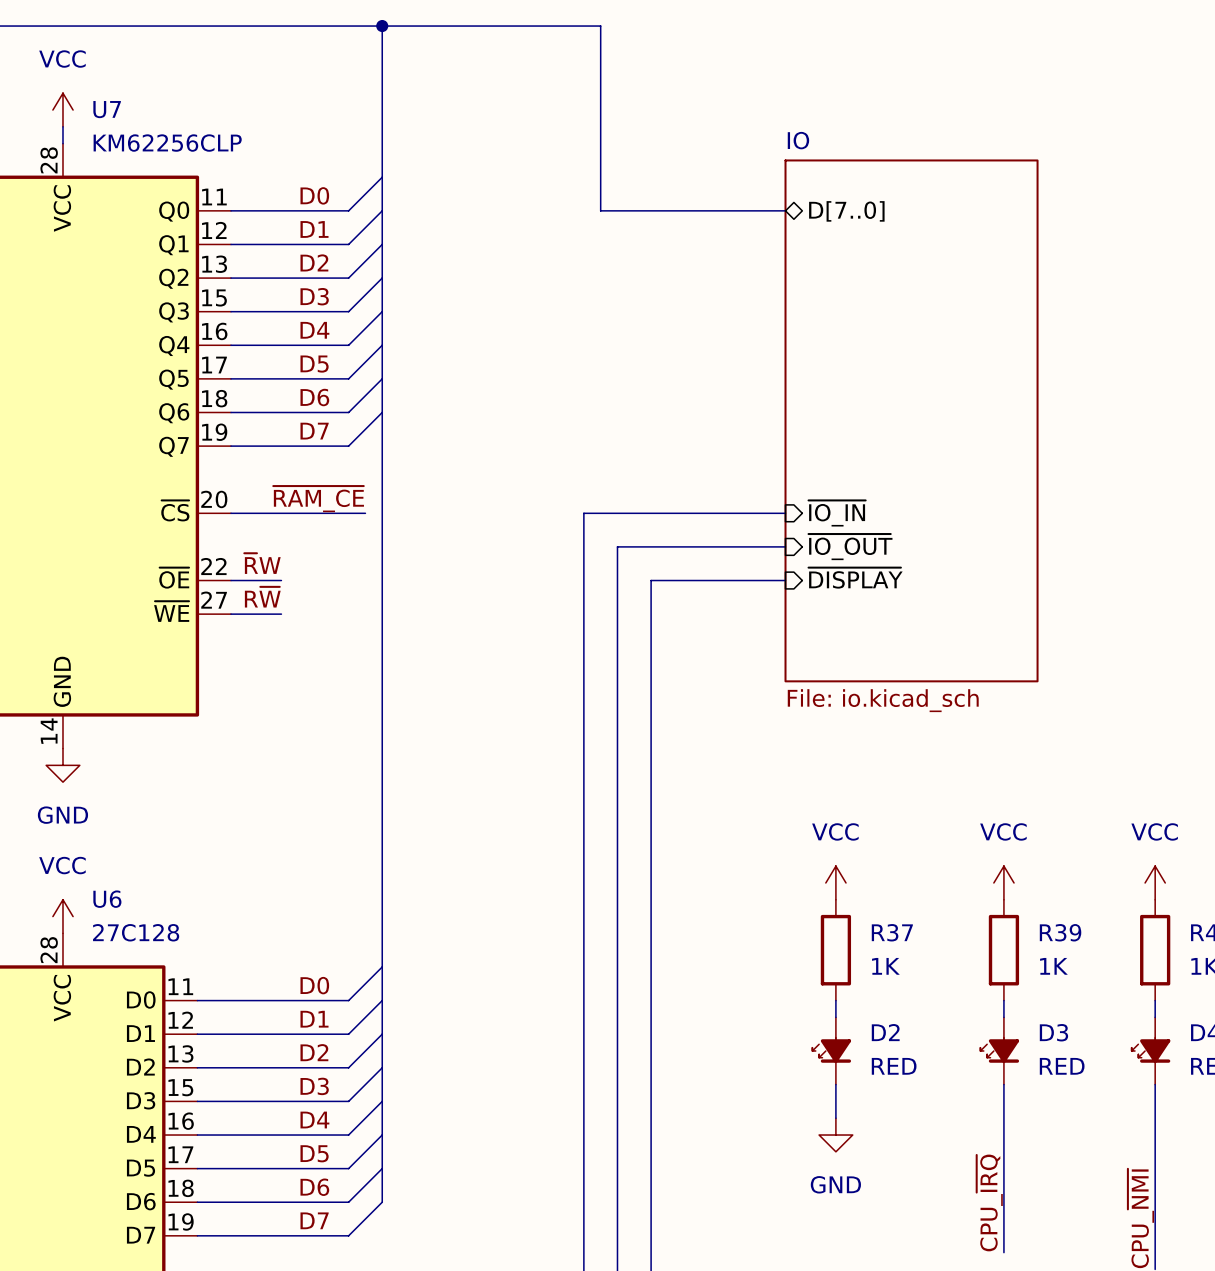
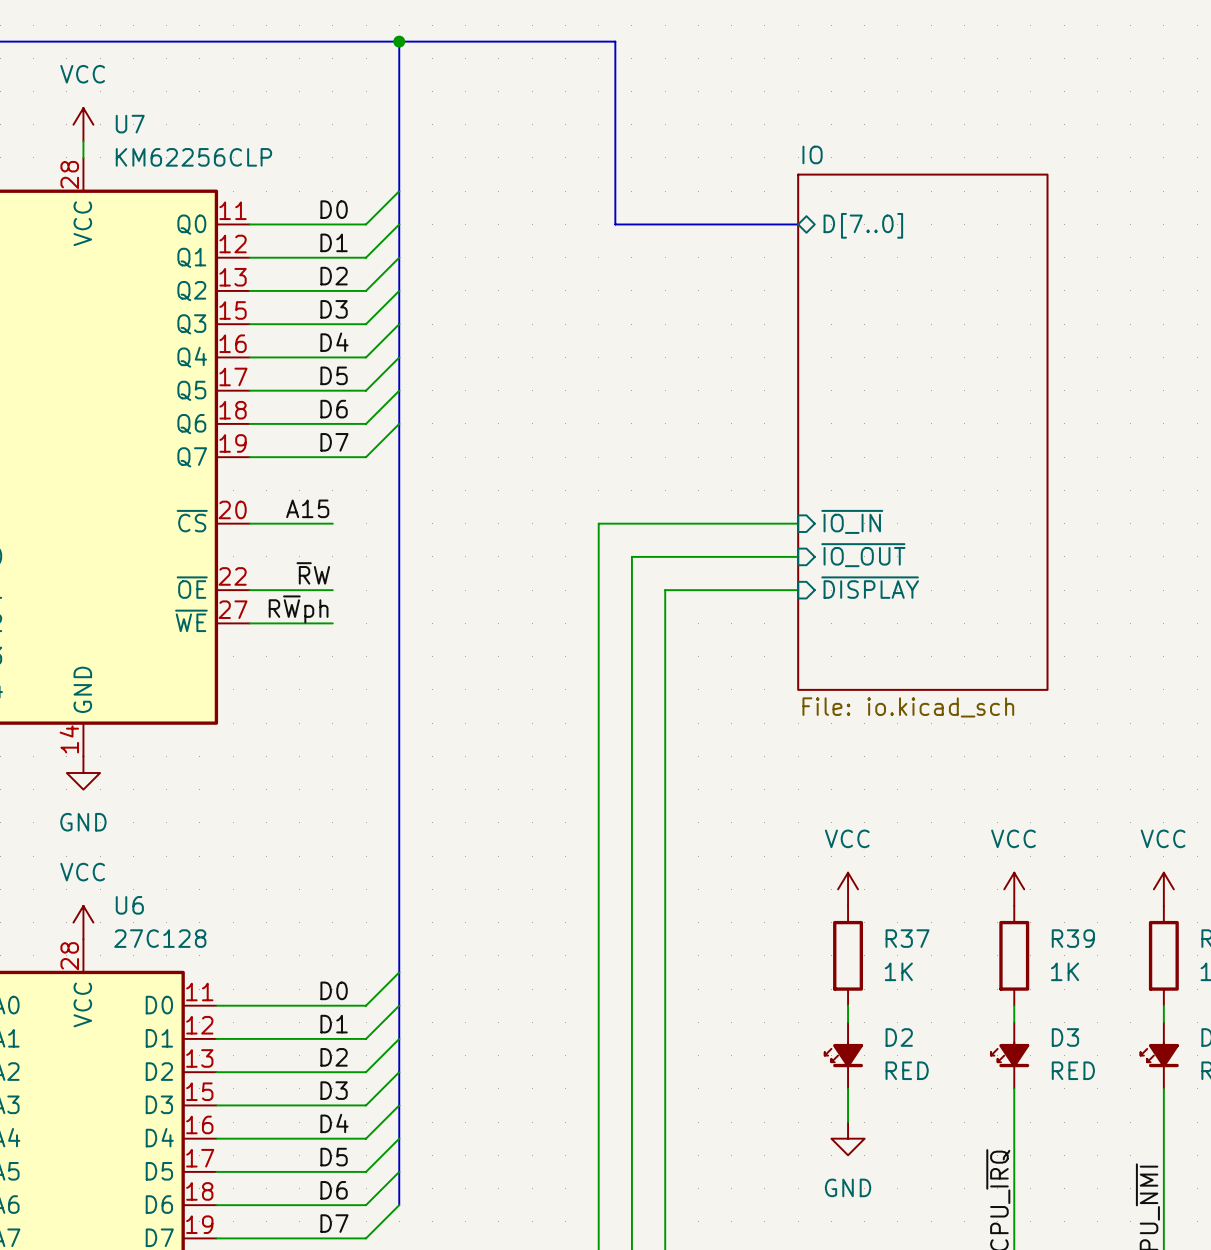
label: none -> A15 (307, 508)
label: ~{RAM_CE} (318, 499) -> none
wire: (315, 513) (365, 513) -> none
label position: ~{R}W (262, 563) -> ~{R}W (313, 573)
wire: none -> (299, 590) (332, 590)
label: R~{W} (262, 597) -> R~{W}ph (298, 609)
wire: none -> (299, 623) (332, 623)

